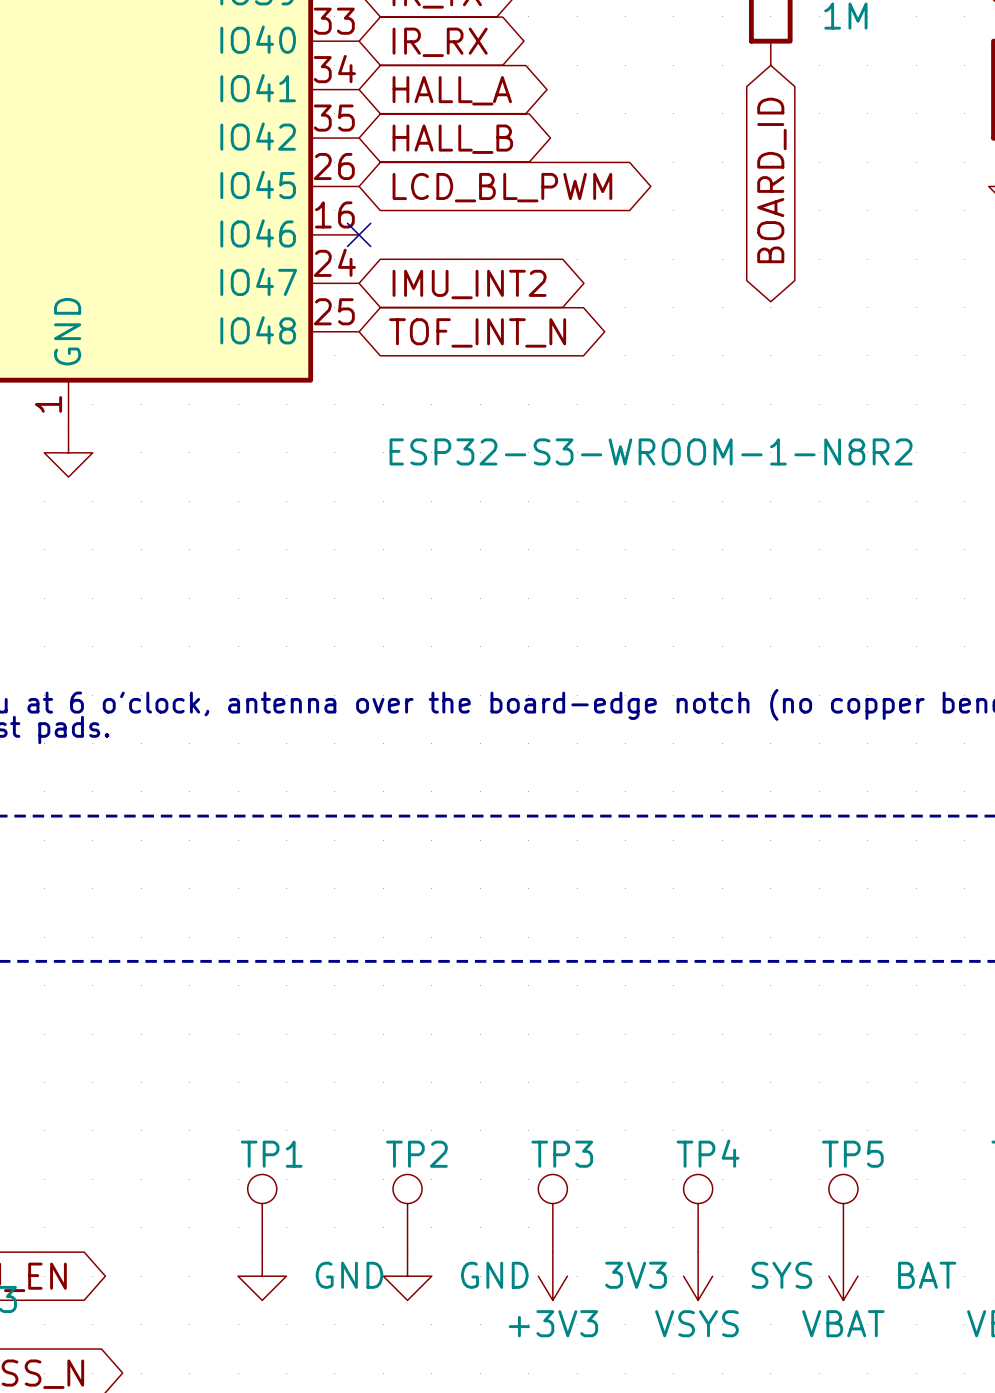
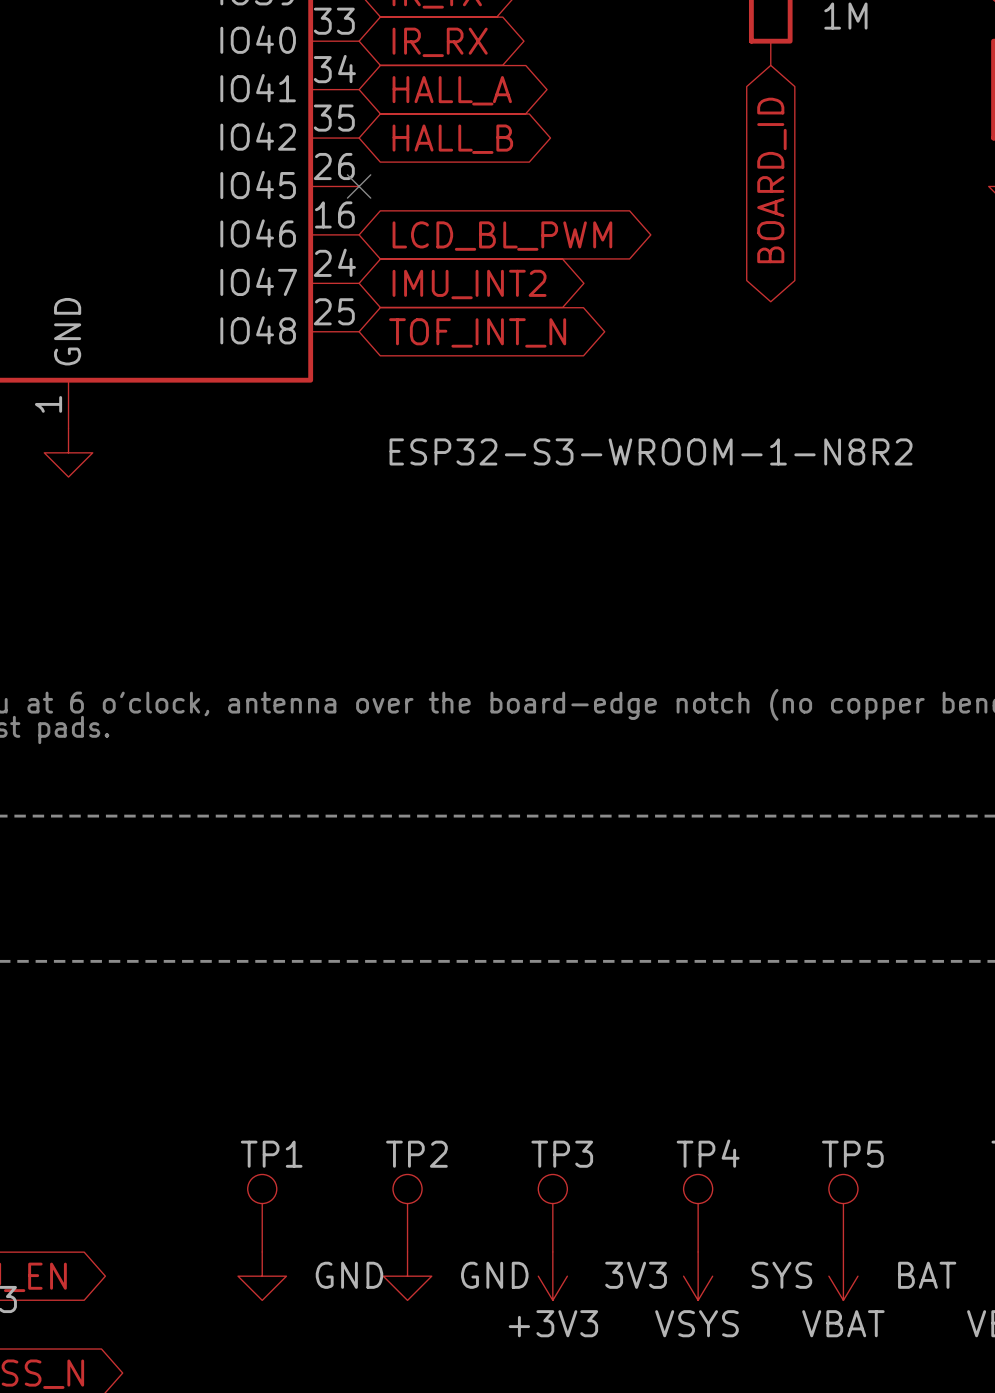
global label position: LCD_BL_PWM (502, 187) -> LCD_BL_PWM (502, 236)
no-connect mark position: (359, 234) -> (359, 186)

